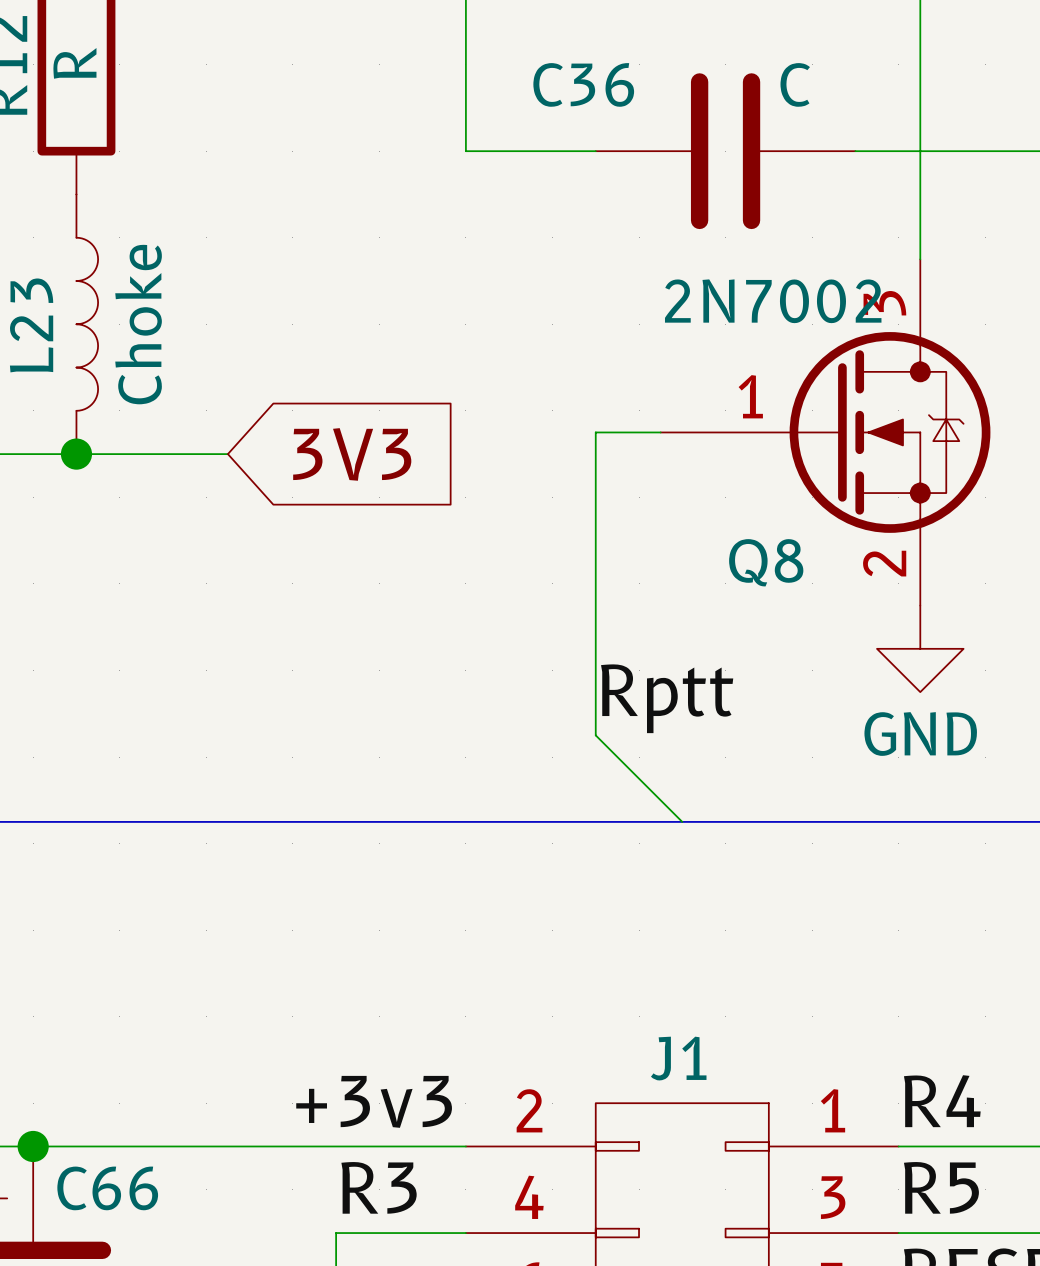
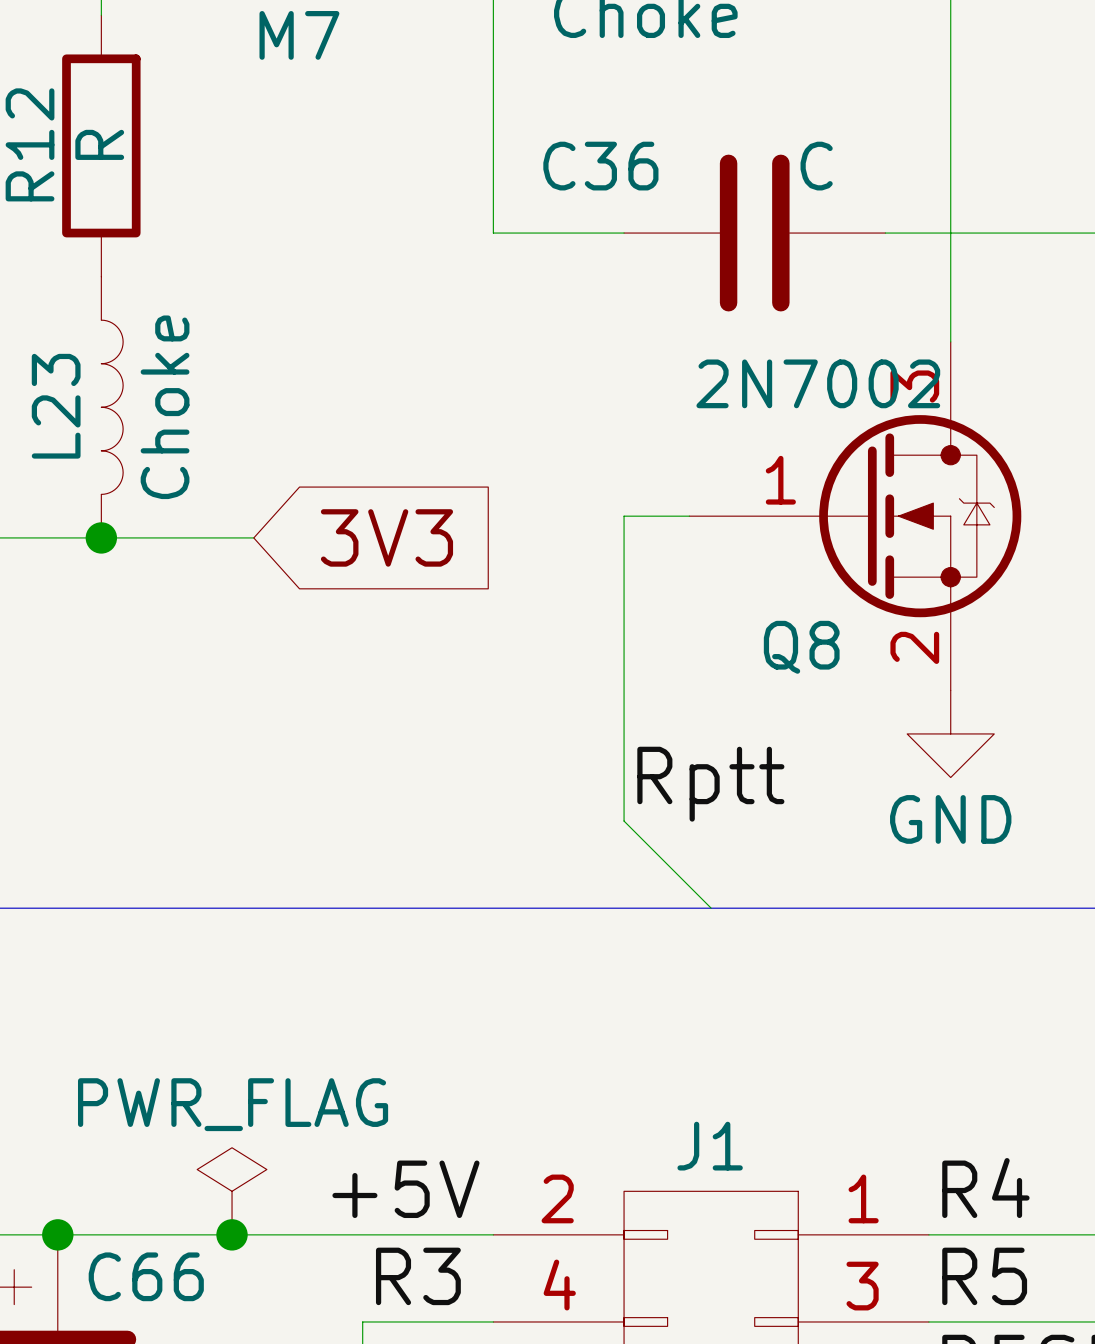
label: +3v3 (374, 1101) -> +5V (405, 1189)
power symbol: none -> PWR_FLAG (232, 1191)
junction: none -> (232, 1234)

